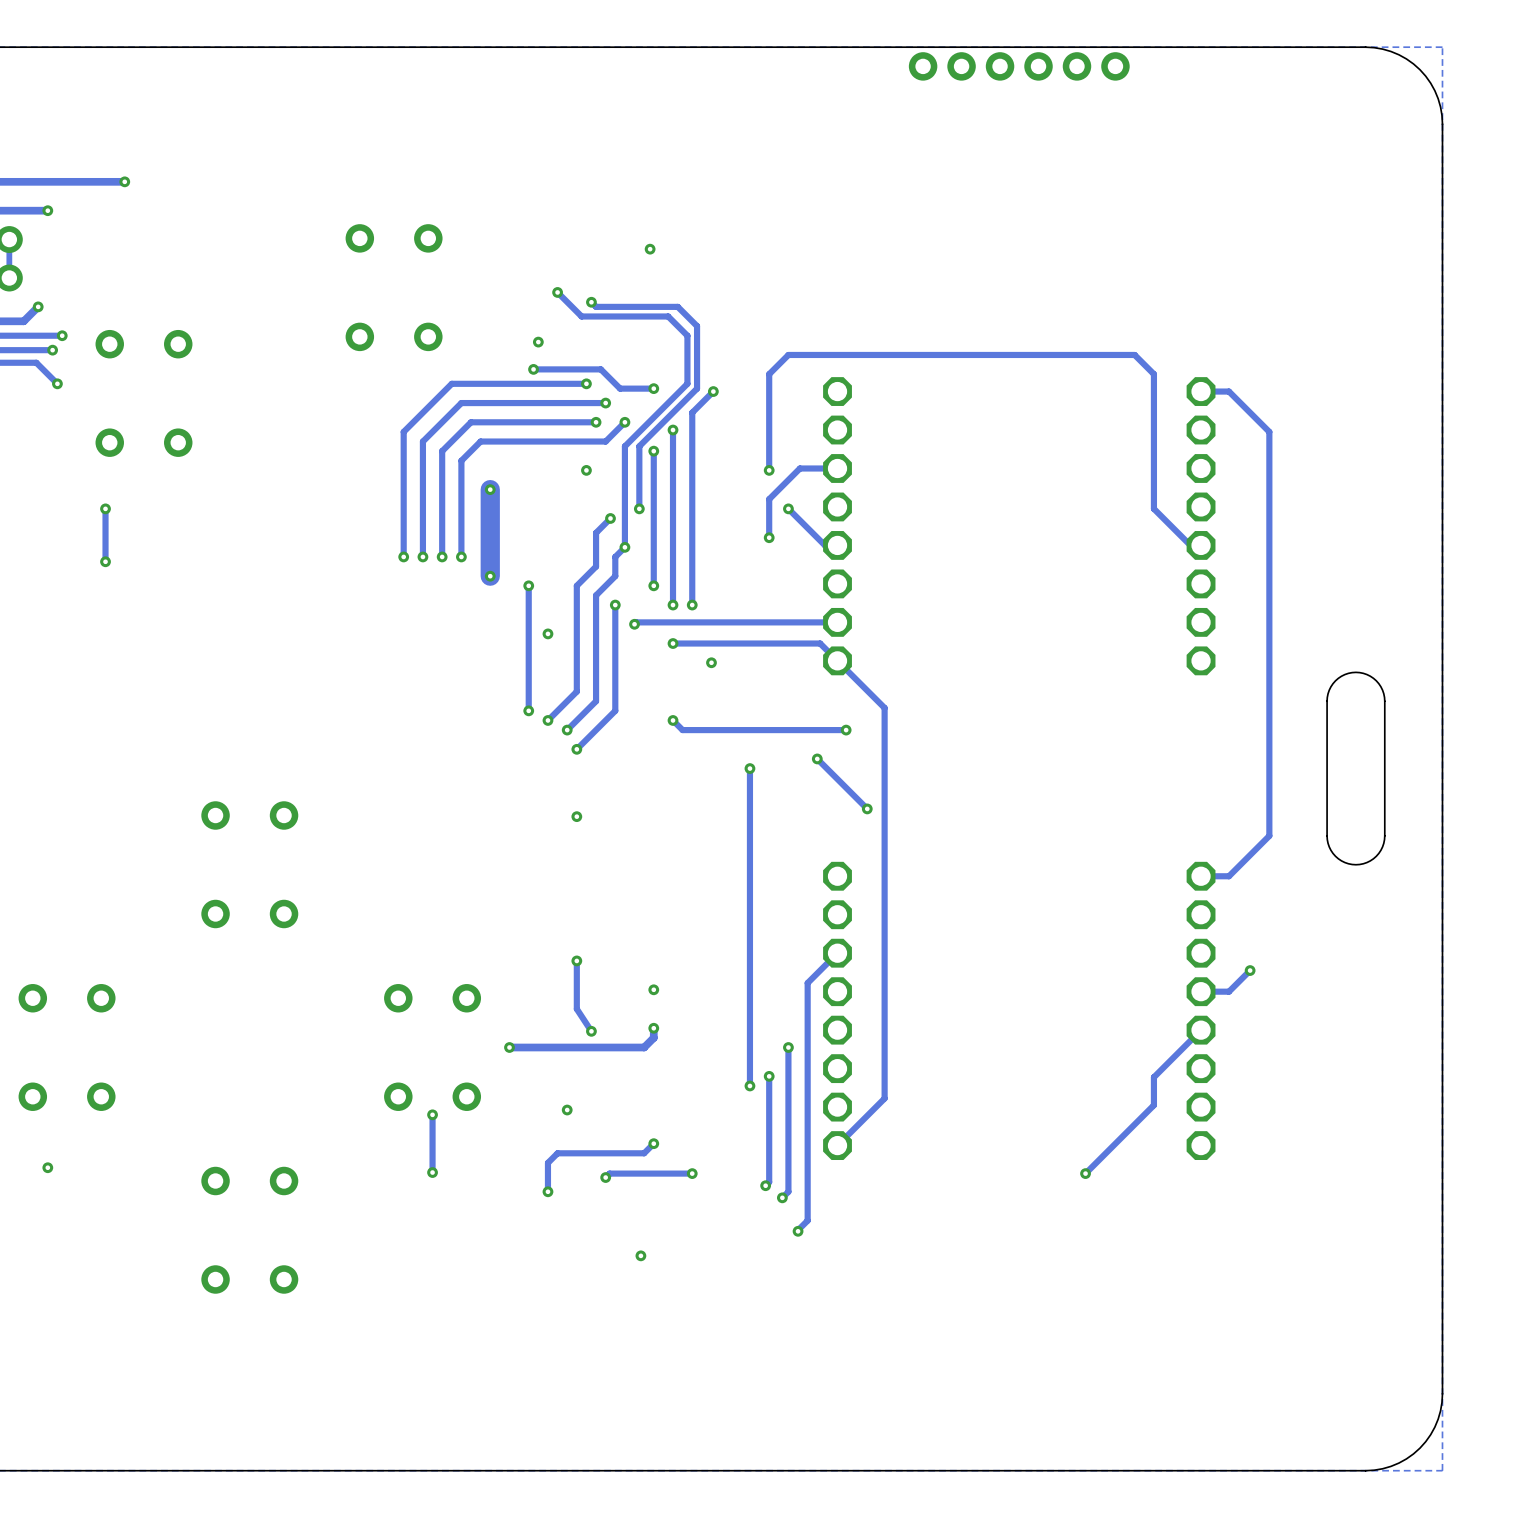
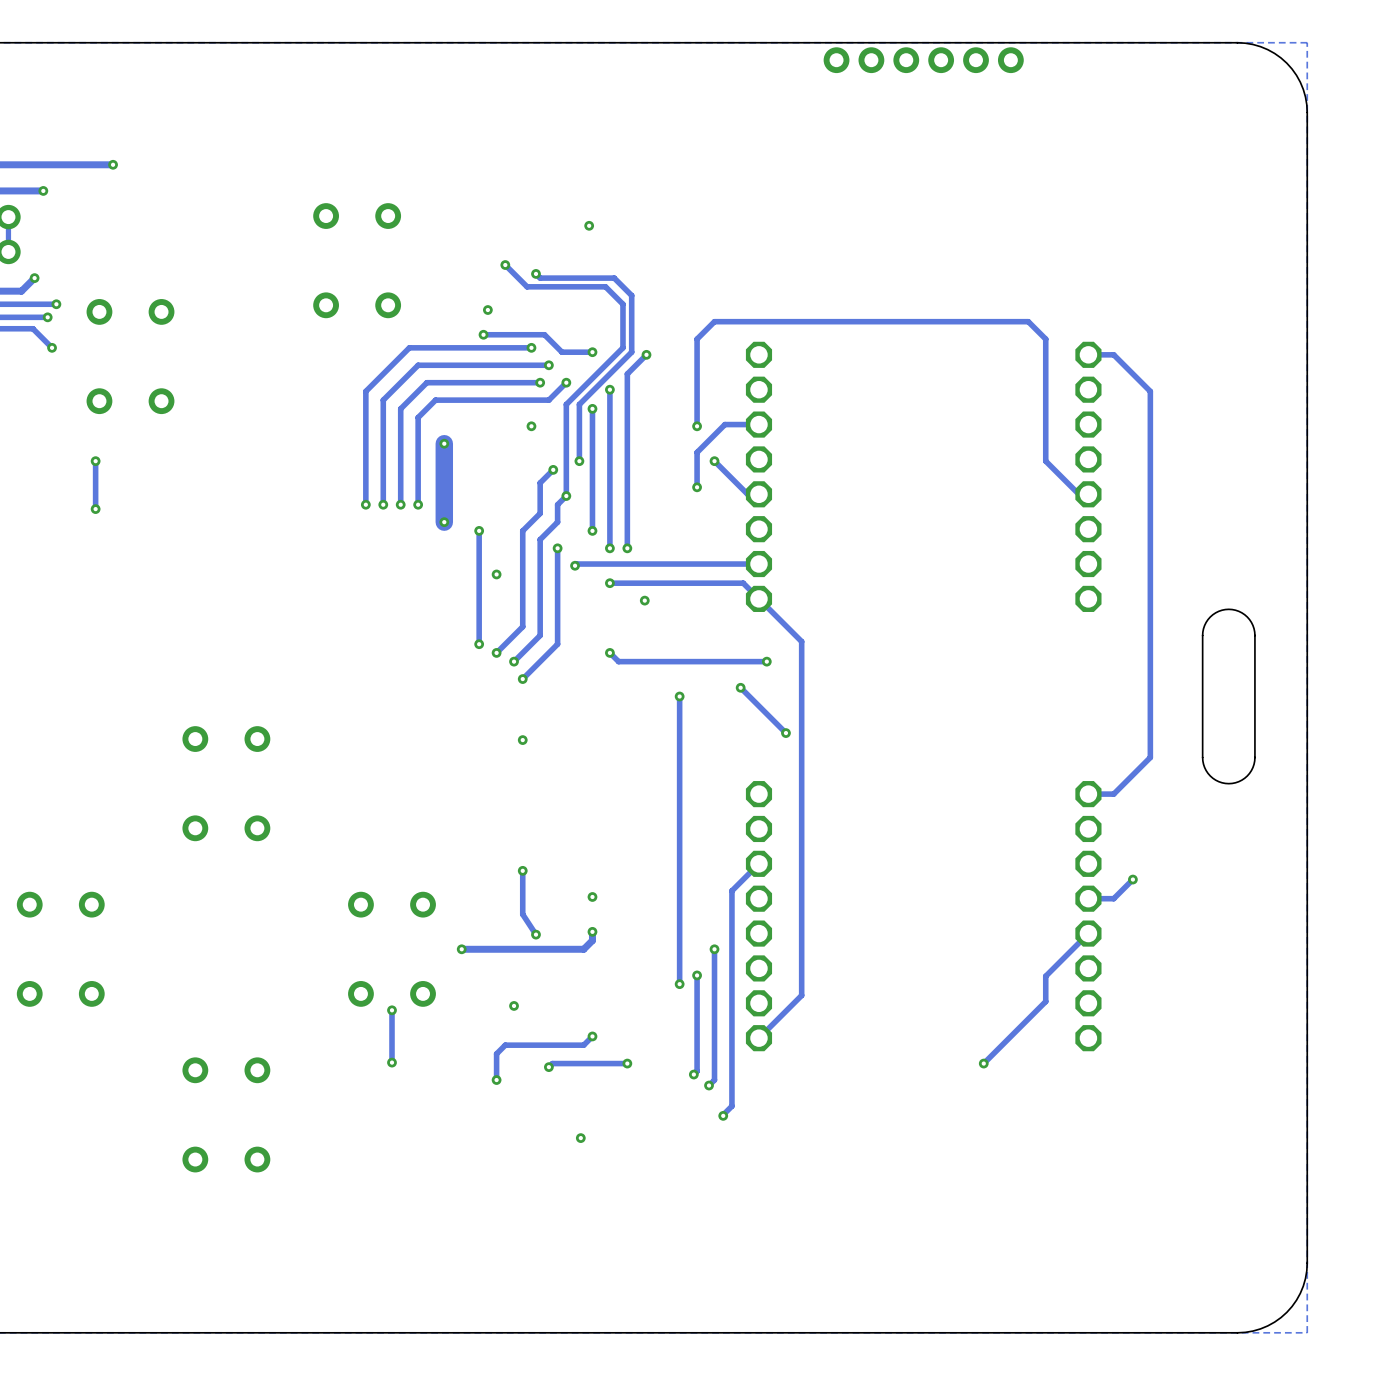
via: (47, 1167) -> none

